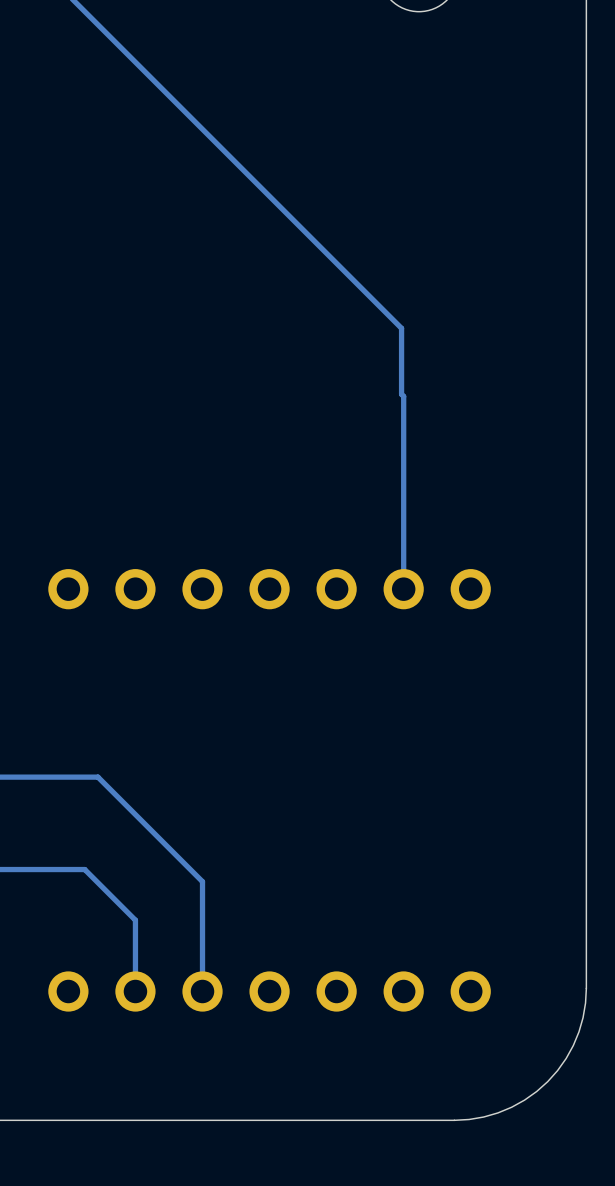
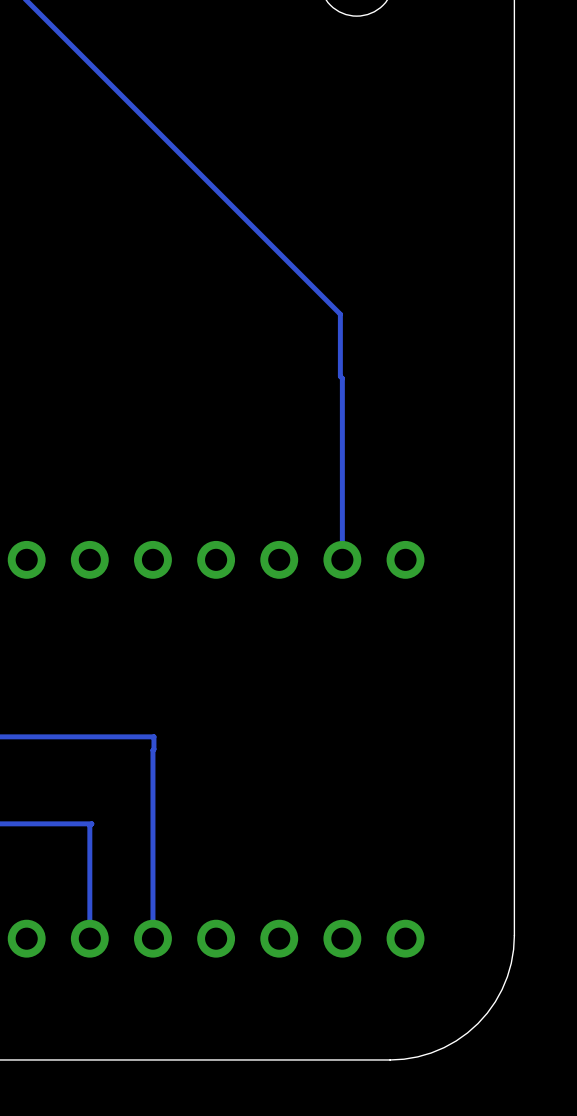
track: (97, 777) (202, 881) -> (54, 736) (153, 736) (152, 835)
track: (84, 869) (135, 920) -> (42, 823) (91, 823) (89, 825) (89, 871)

